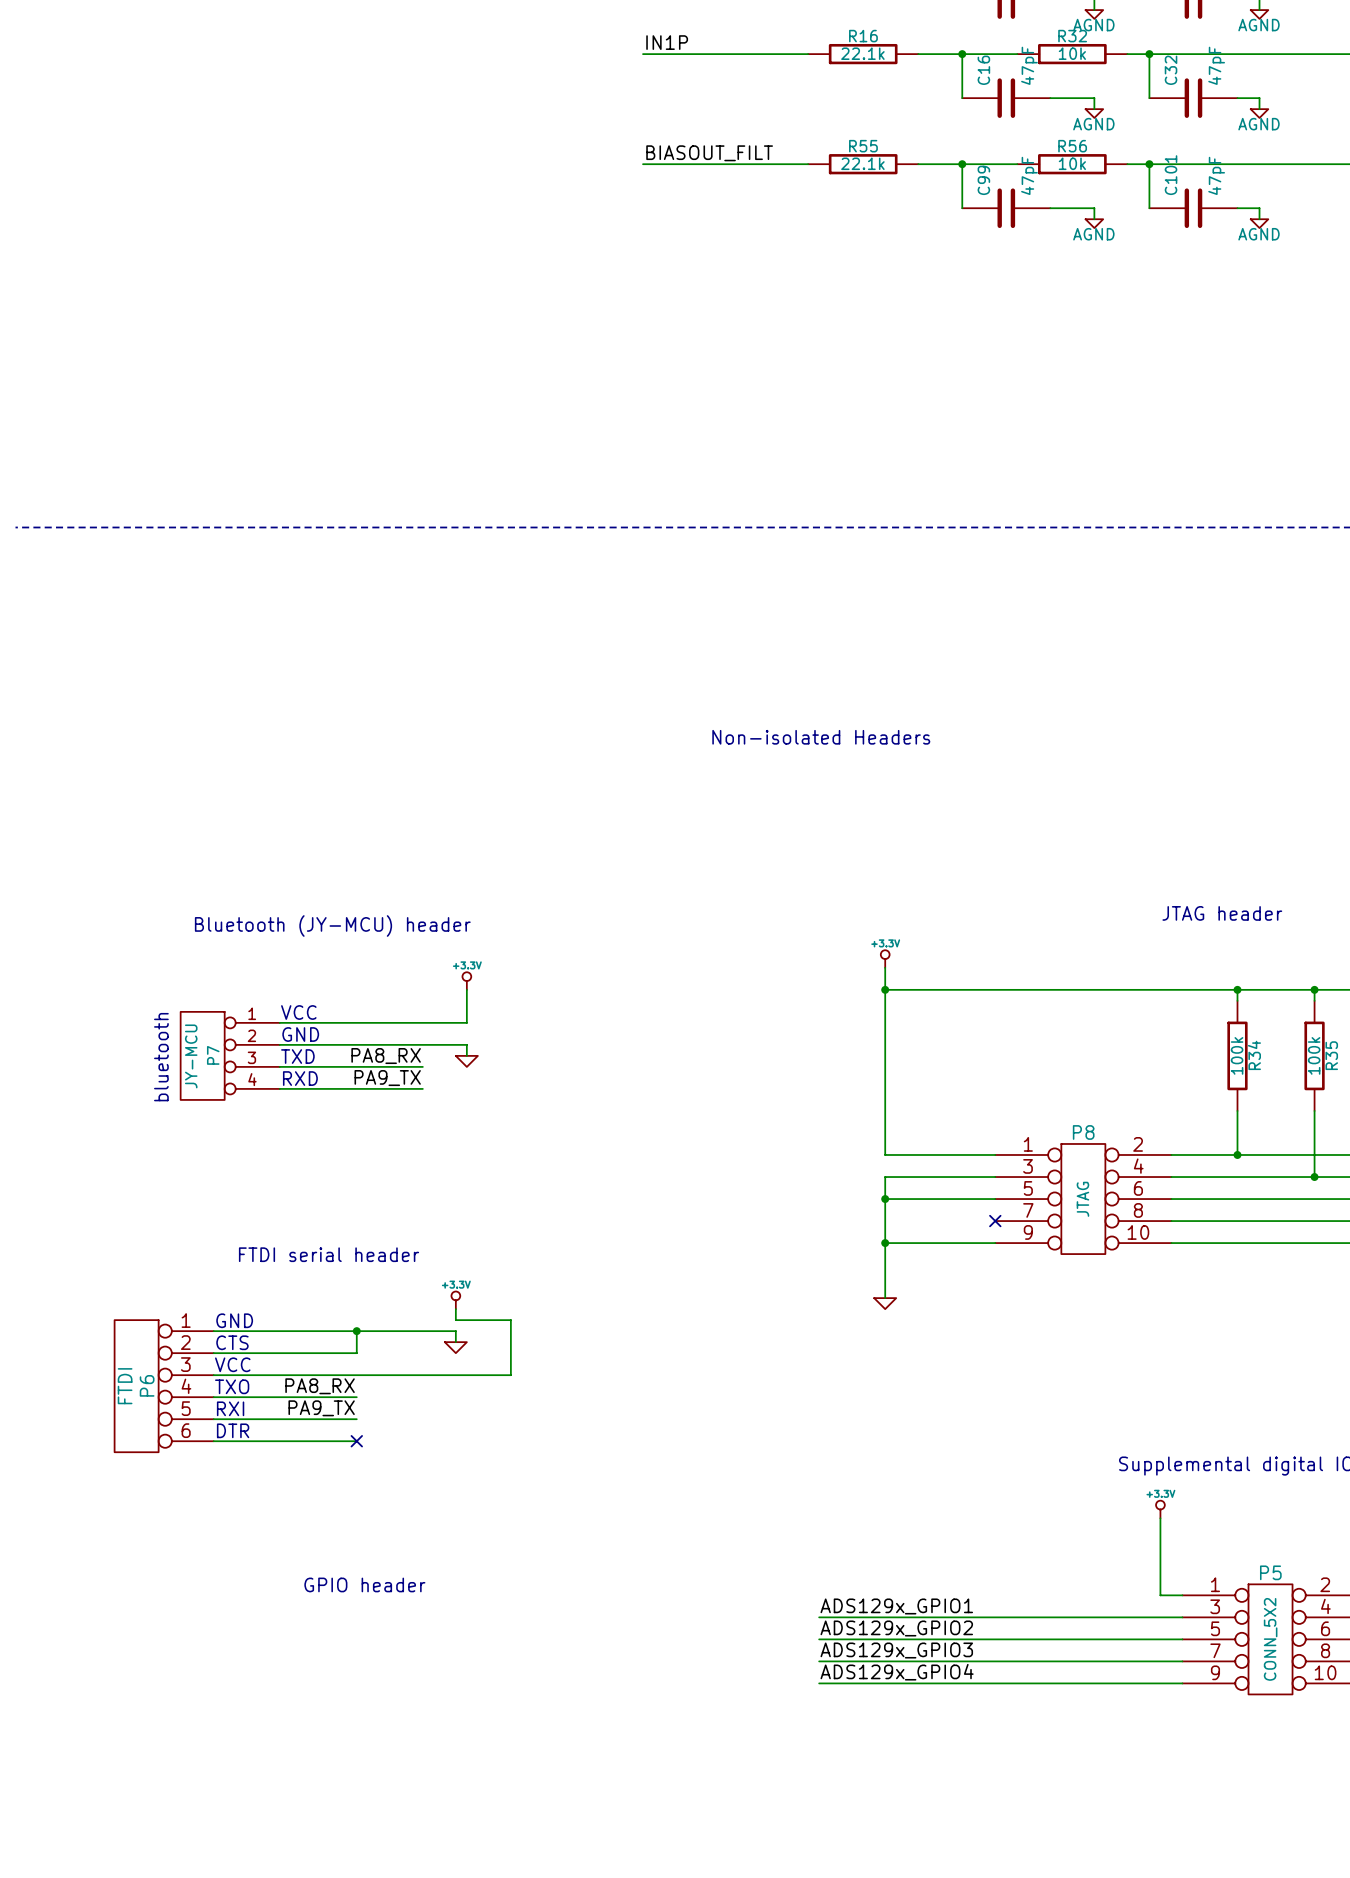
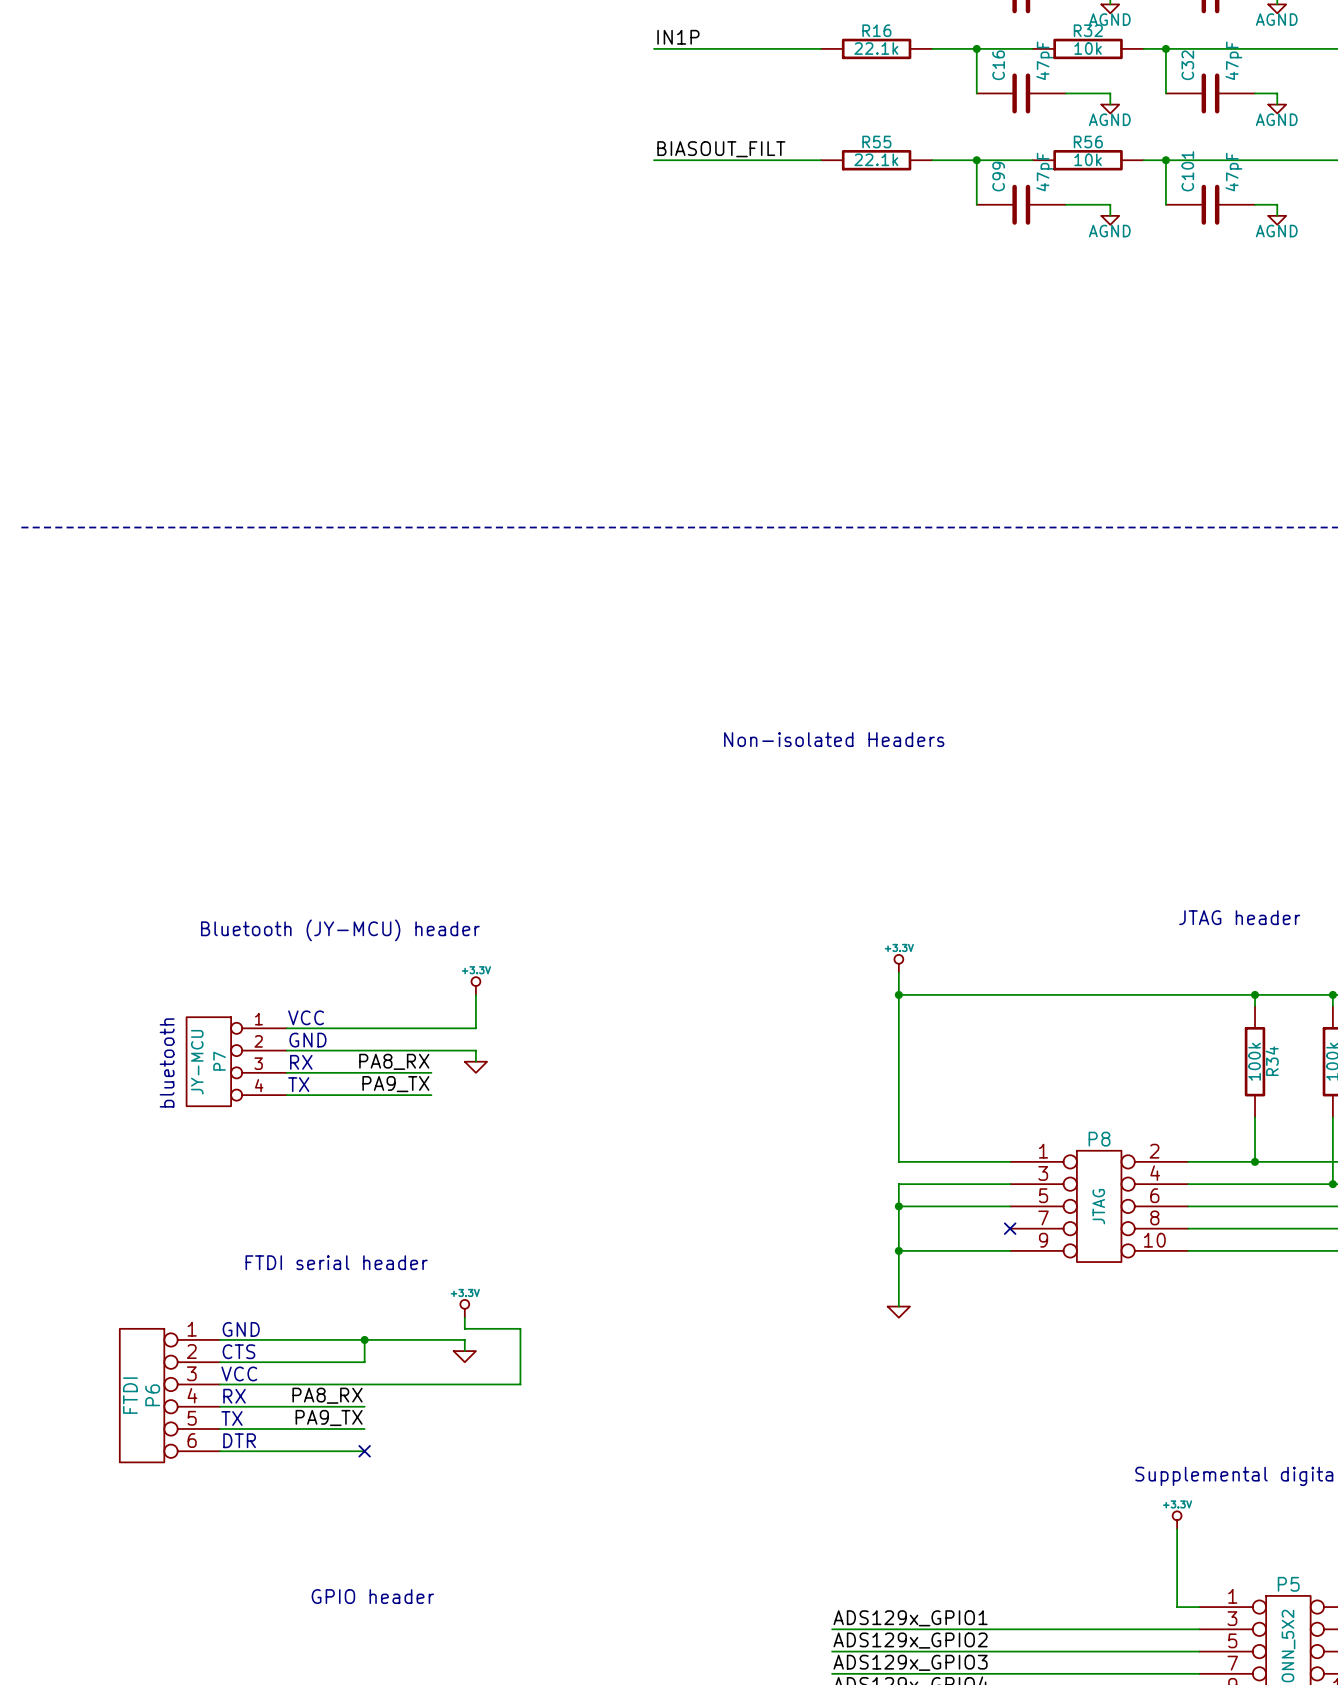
text: TXD (297, 1056) -> RX (301, 1062)
text: RXD (300, 1078) -> TX (298, 1084)
text: TXO (232, 1386) -> RX (234, 1396)
text: RXI (230, 1408) -> TX (231, 1418)

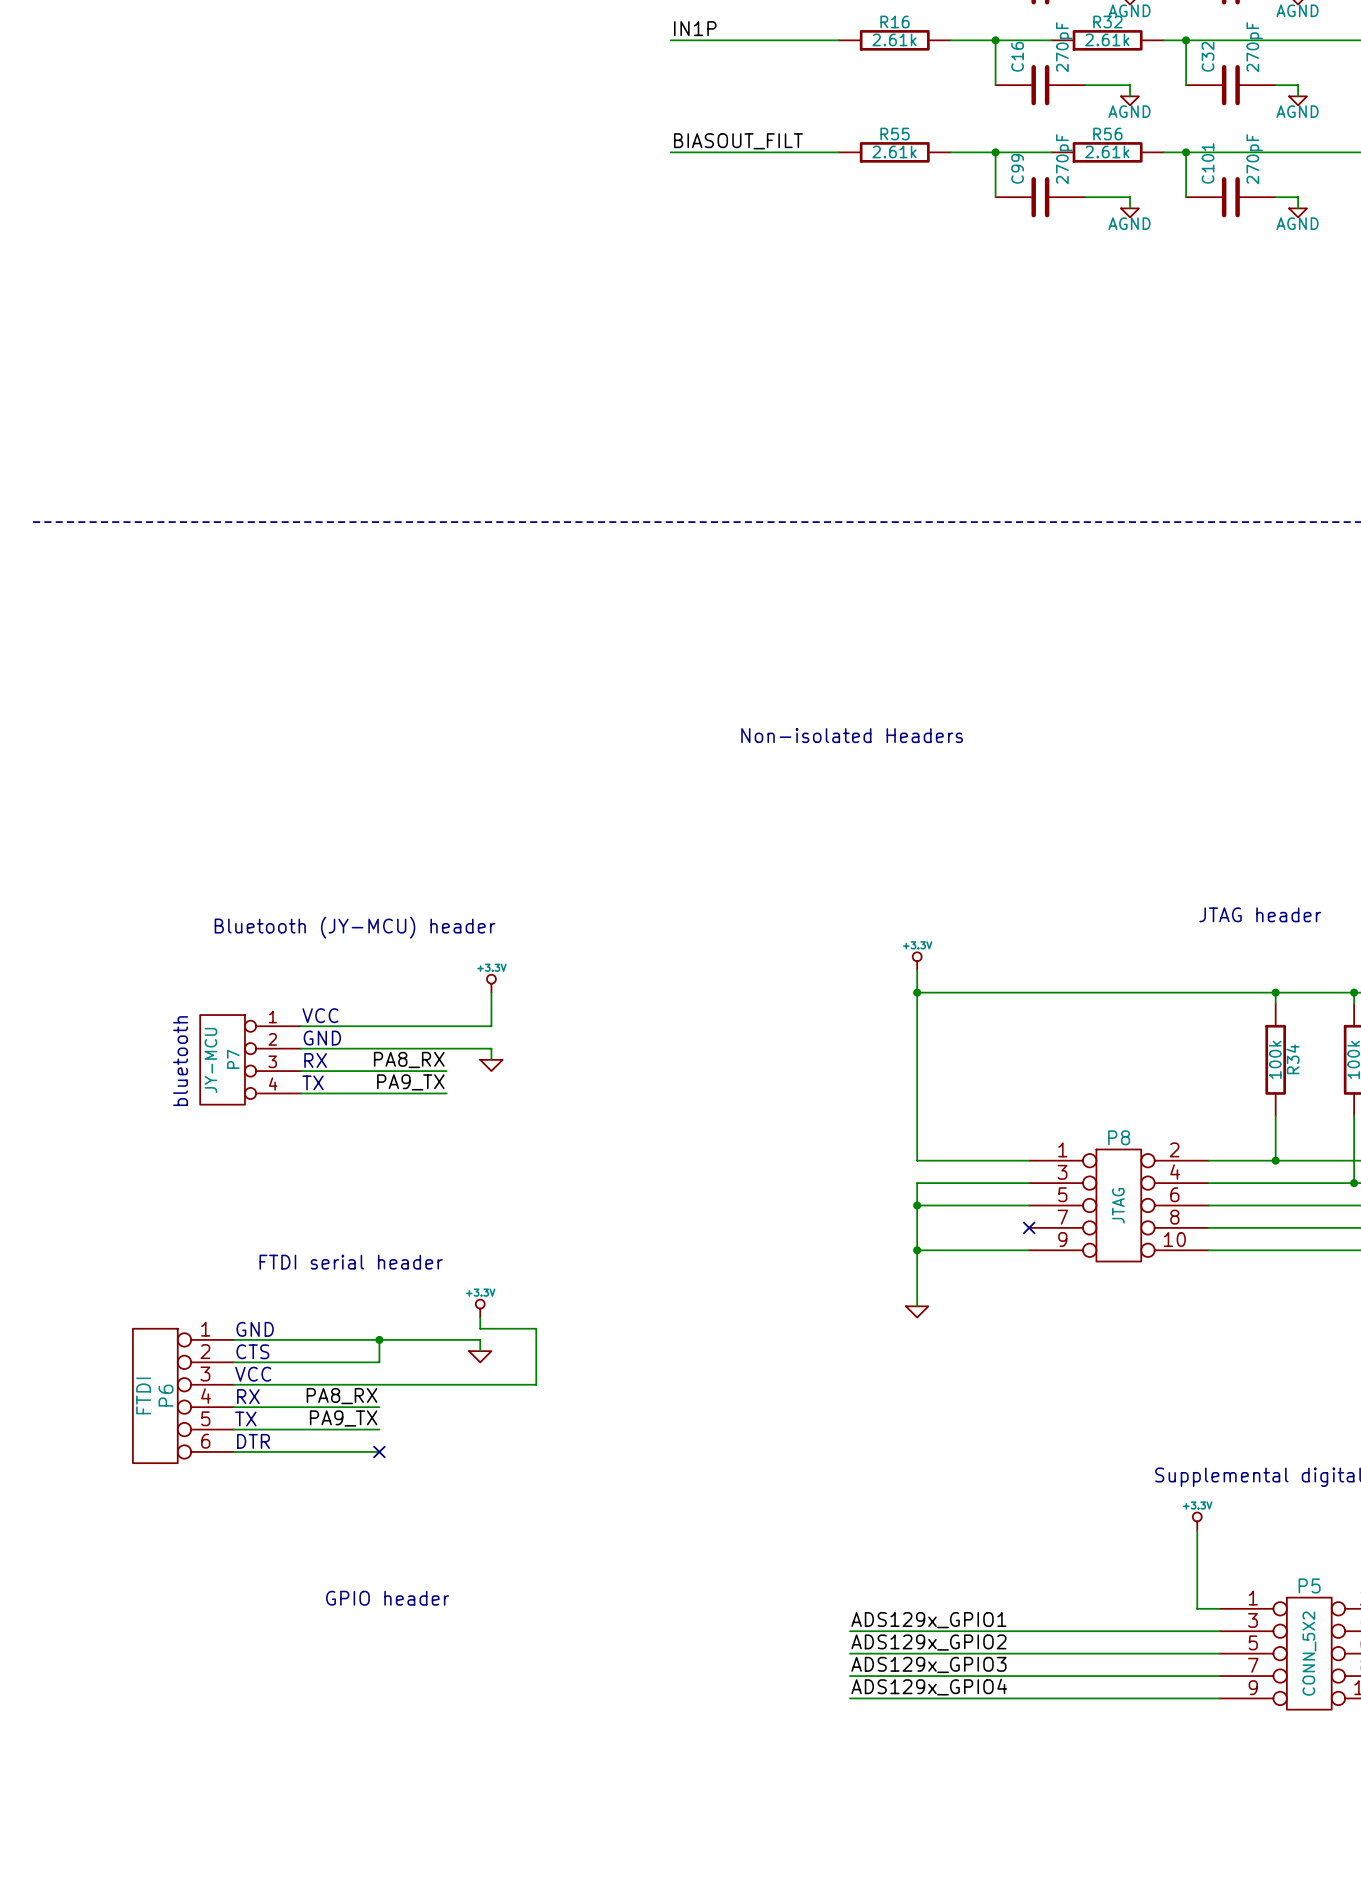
R16 value: 22.1k (876, 48) -> 2.61k (894, 39)
R32 value: 10k (1088, 48) -> 2.61k (1107, 39)
C16 value: 47pF (1044, 60) -> 270pF (1064, 47)
C32 value: 47pF (1233, 60) -> 270pF (1254, 47)
R55 value: 22.1k (876, 159) -> 2.61k (894, 151)
R56 value: 10k (1088, 159) -> 2.61k (1107, 151)
C99 value: 47pF (1044, 172) -> 270pF (1064, 159)
C101 value: 47pF (1233, 172) -> 270pF (1254, 159)

